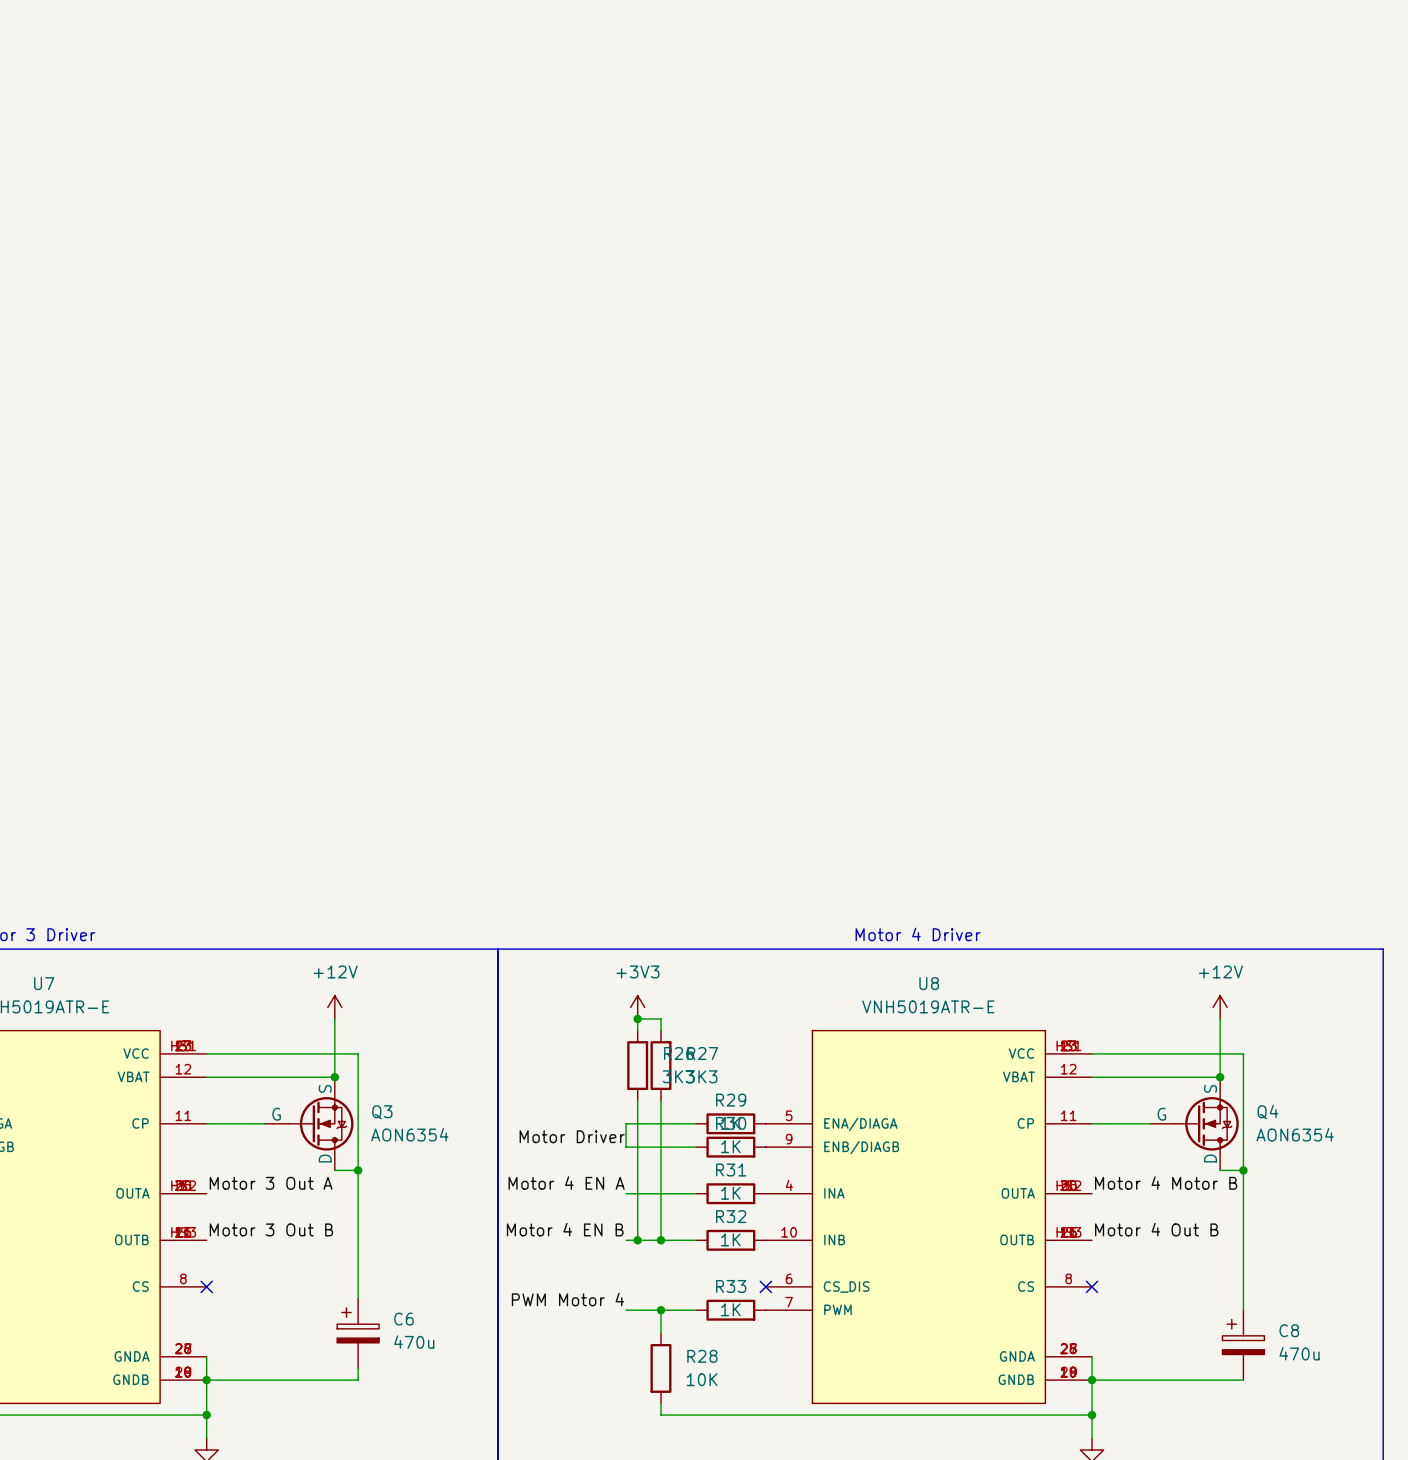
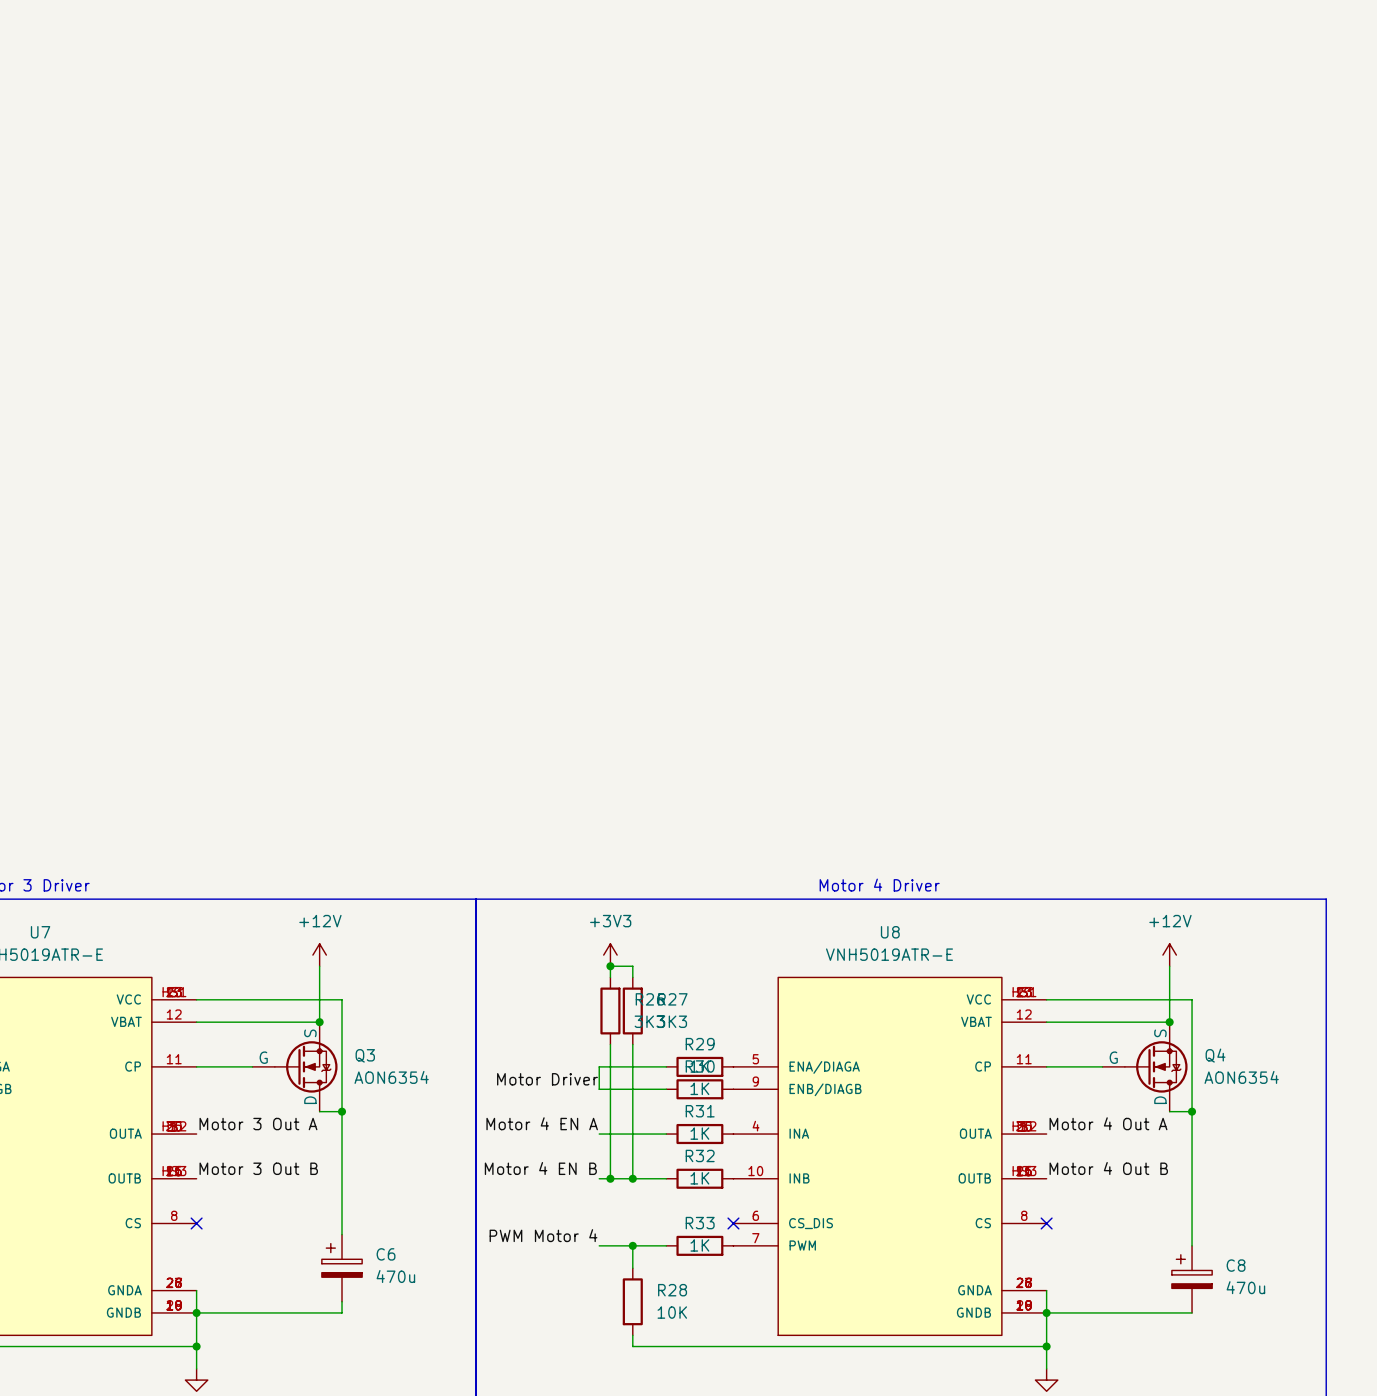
label: Motor 4 Motor B (1166, 1183) -> Motor 4 Out A (1108, 1123)

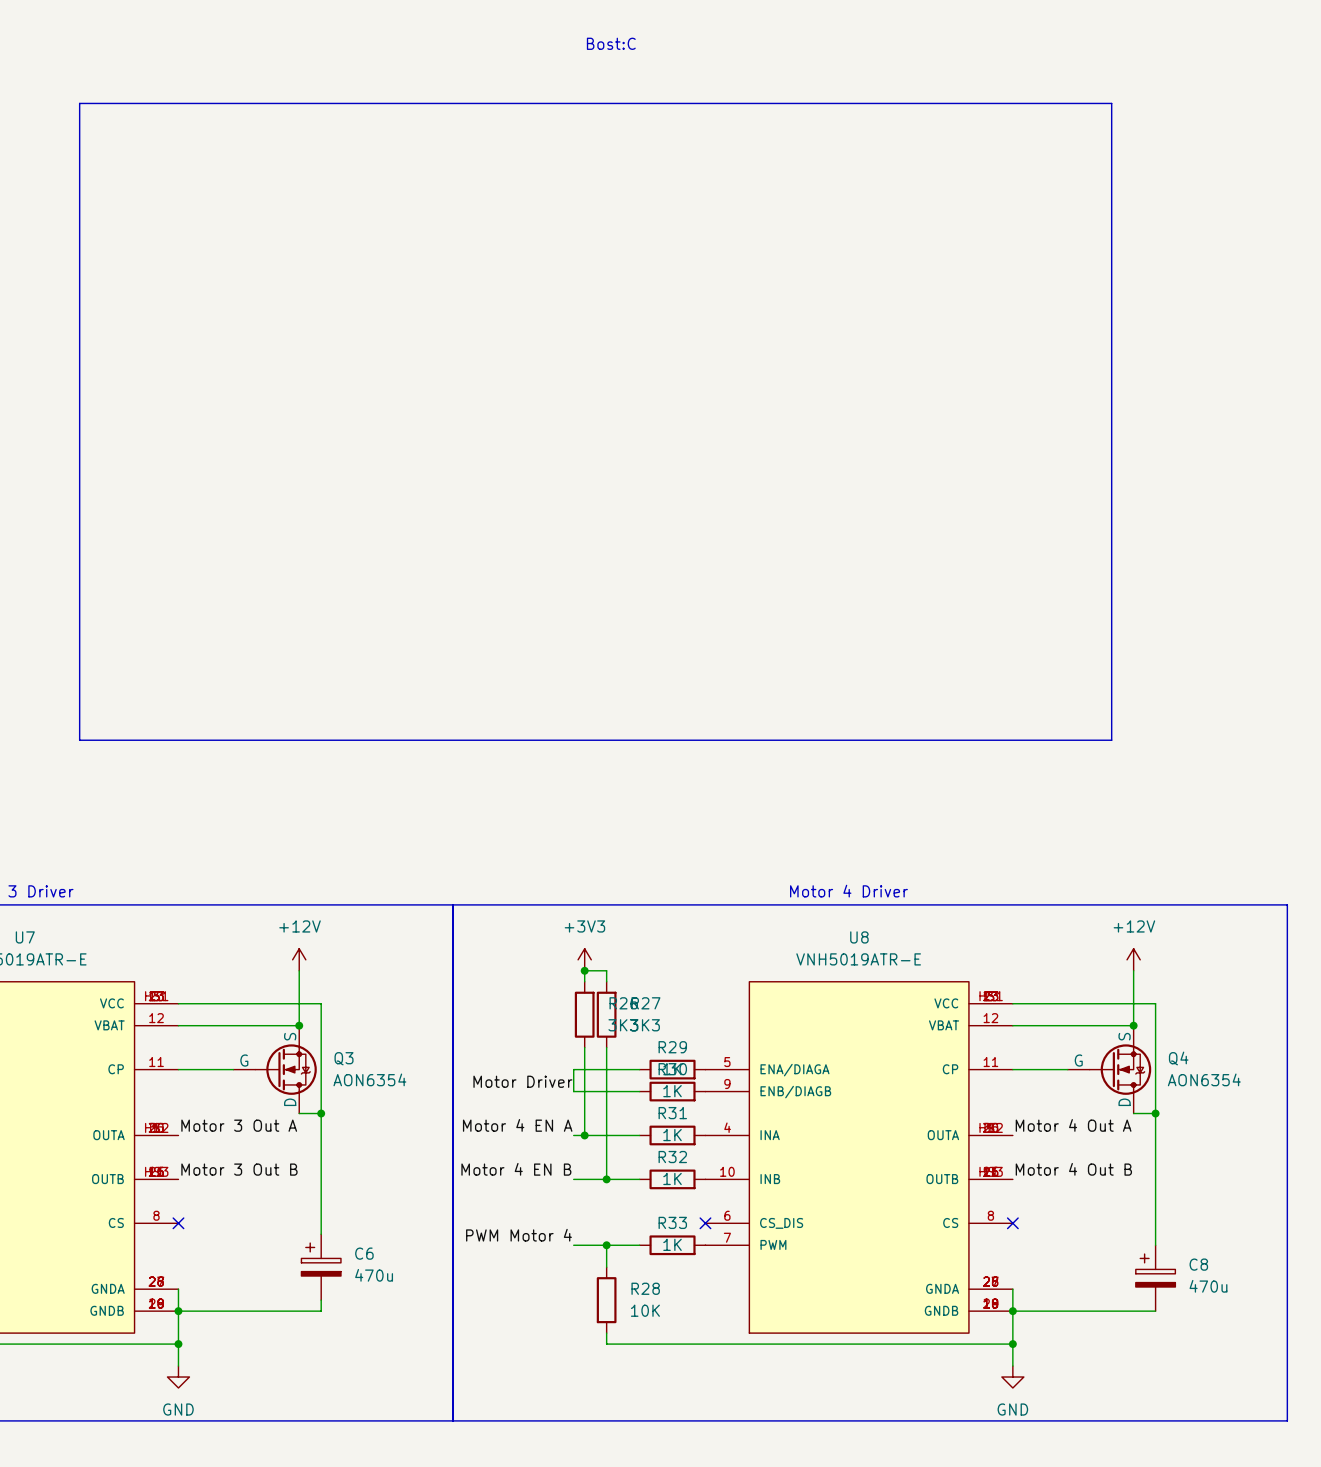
text: none -> Bost:C (611, 43)
line: none -> (79, 103) (1111, 103) (1111, 740) (79, 740) (79, 103)
wire: (610, 1134) (610, 1178) -> none
junction position: (610, 1178) -> (584, 1135)

